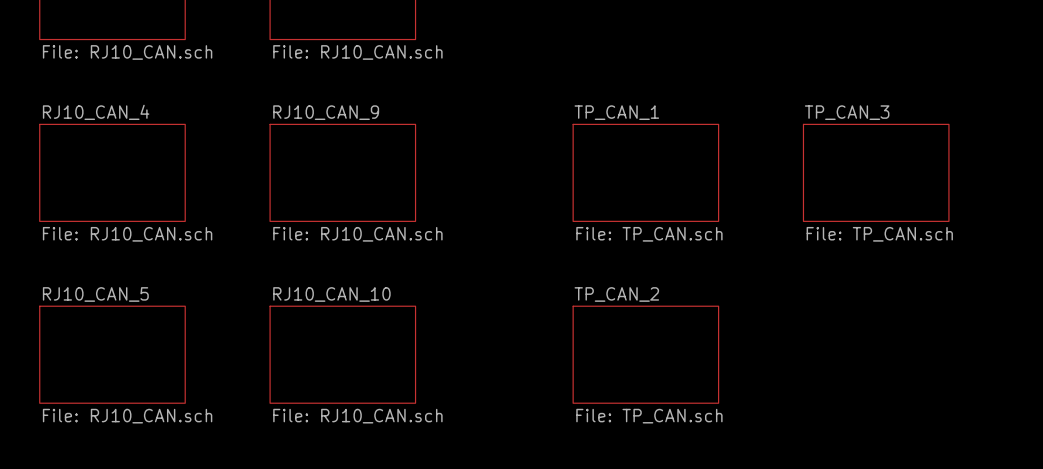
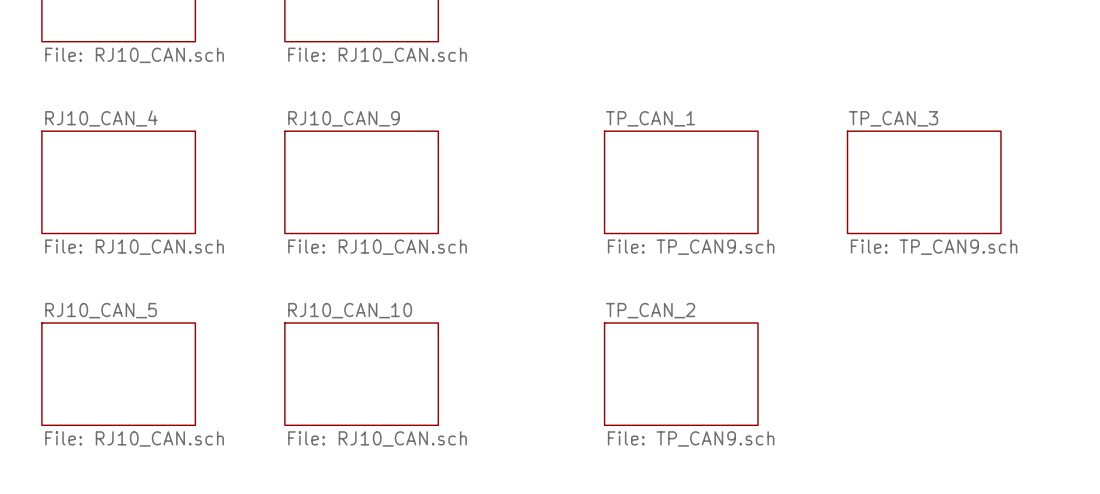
sheet TP_CAN_1 value: File: TP_CAN.sch (649, 234) -> File: TP_CAN9.sch (691, 247)
sheet TP_CAN_3 value: File: TP_CAN.sch (879, 234) -> File: TP_CAN9.sch (934, 247)
sheet TP_CAN_2 value: File: TP_CAN.sch (649, 416) -> File: TP_CAN9.sch (691, 438)

